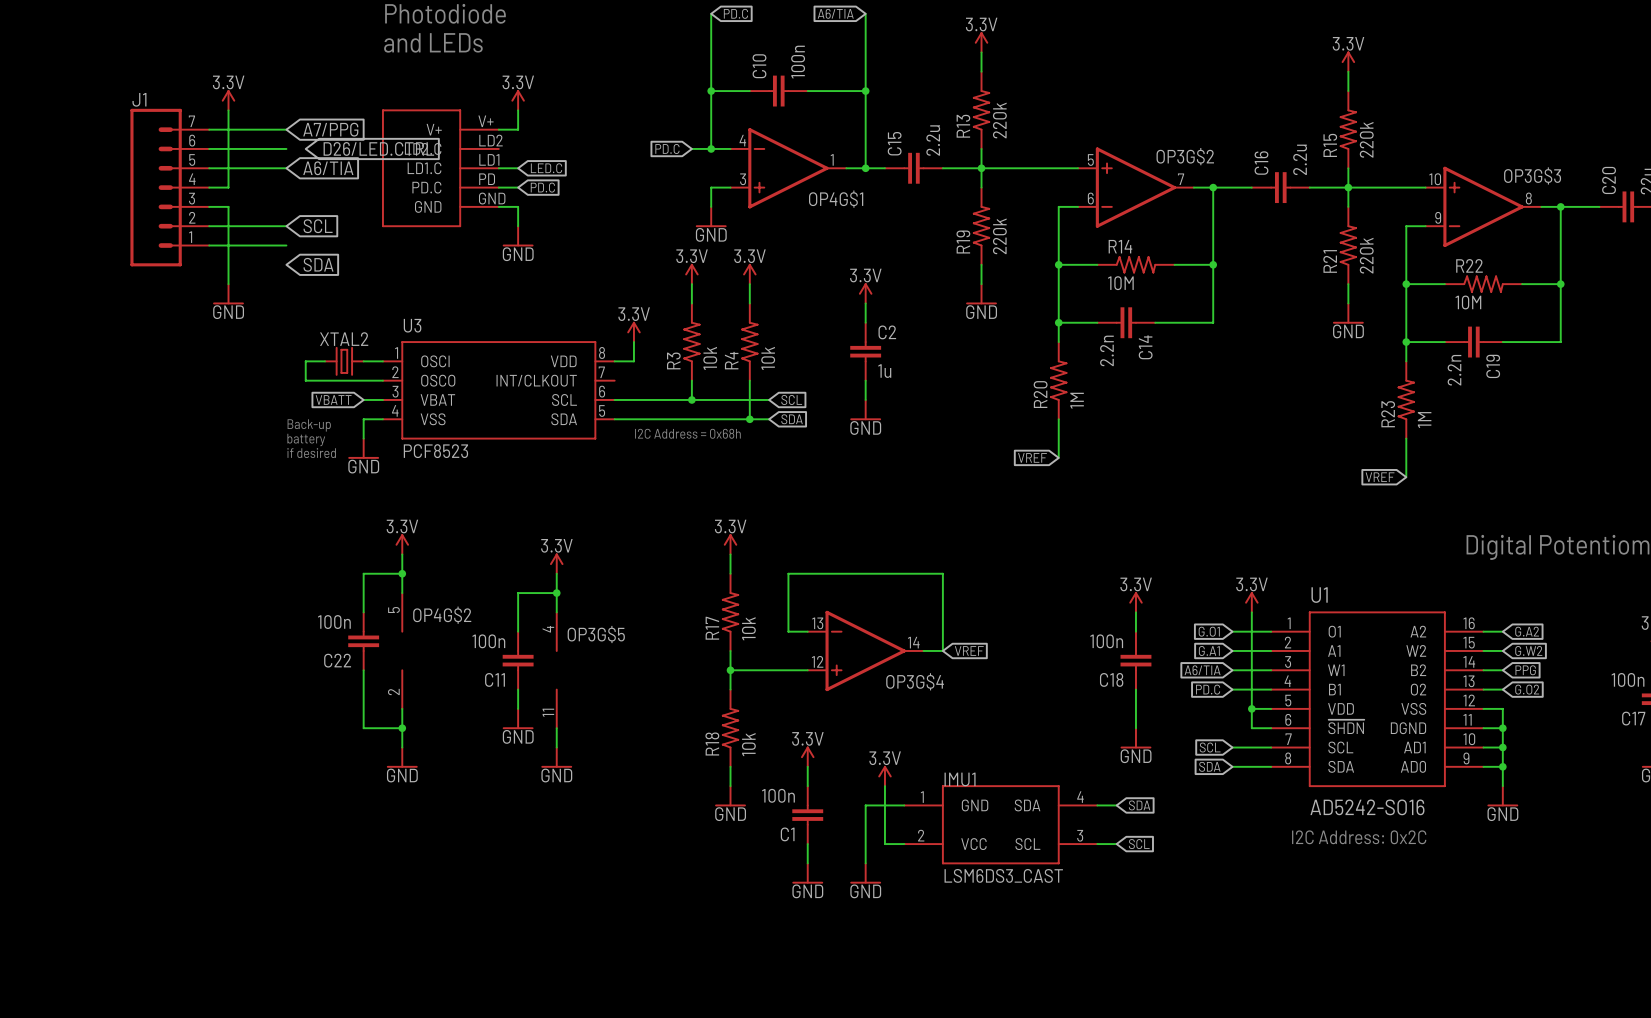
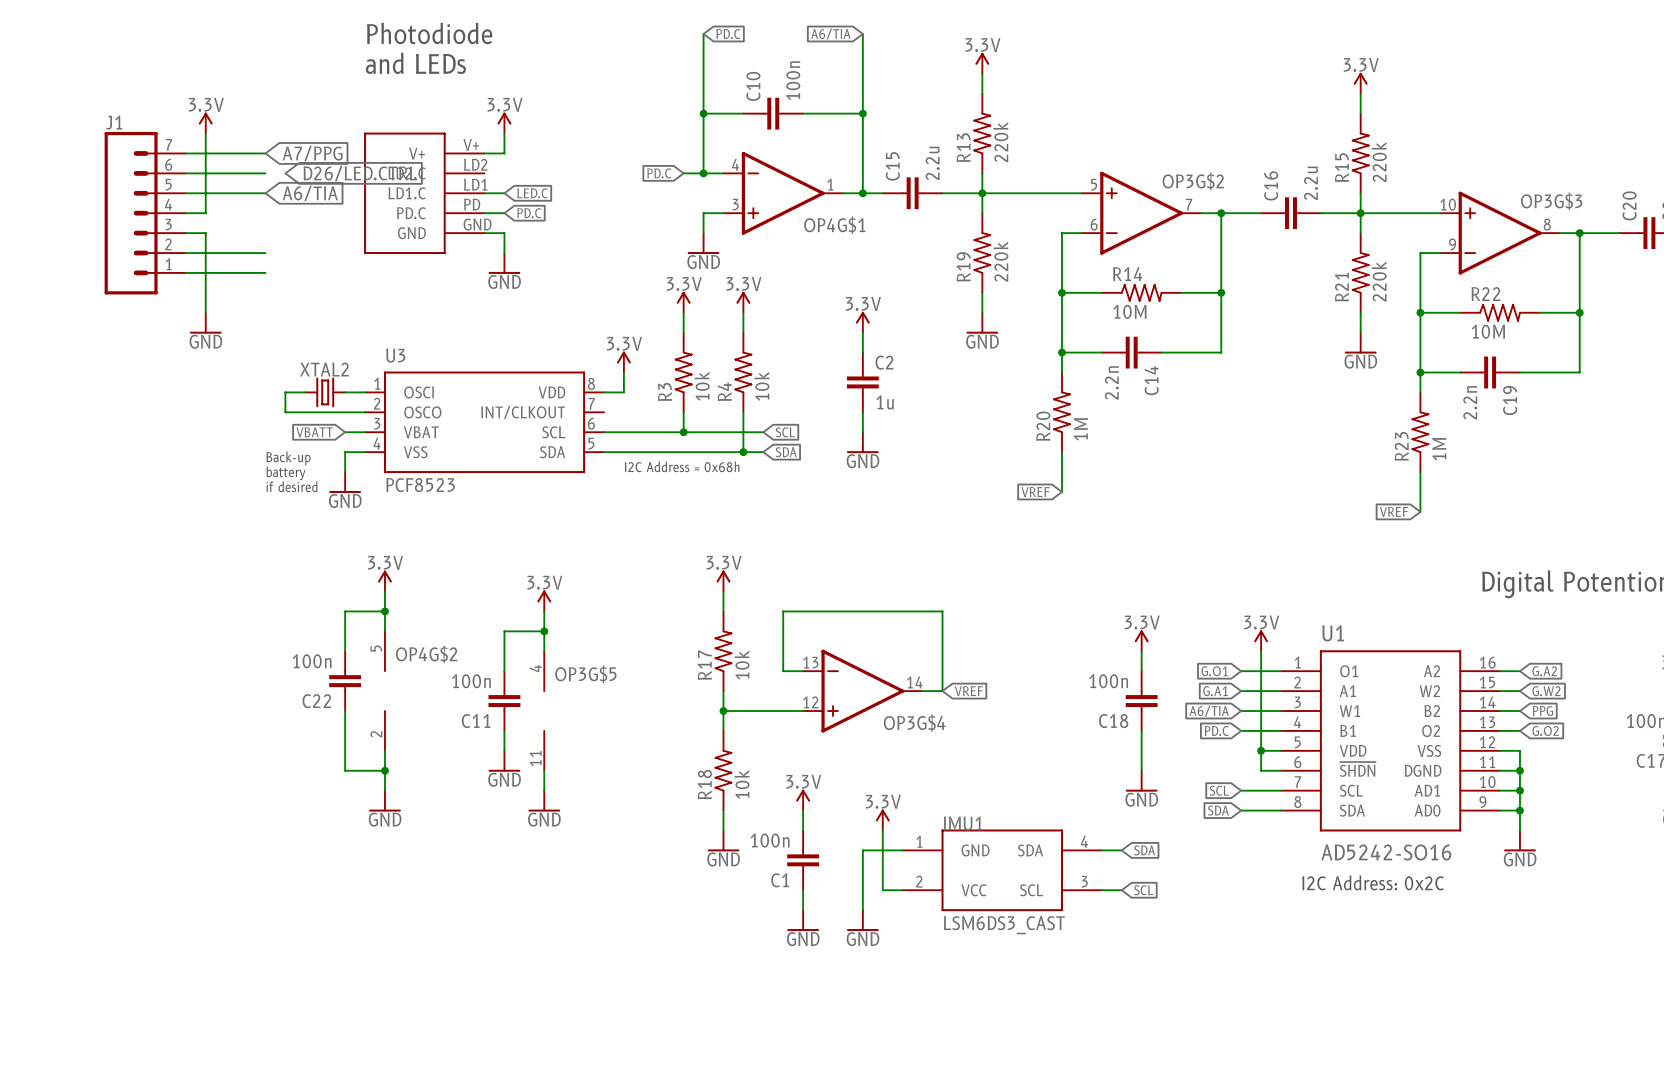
global label: SCL (318, 226) -> none
global label: SDA (318, 264) -> none

